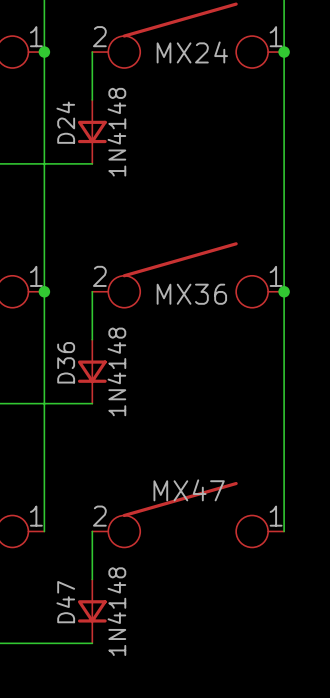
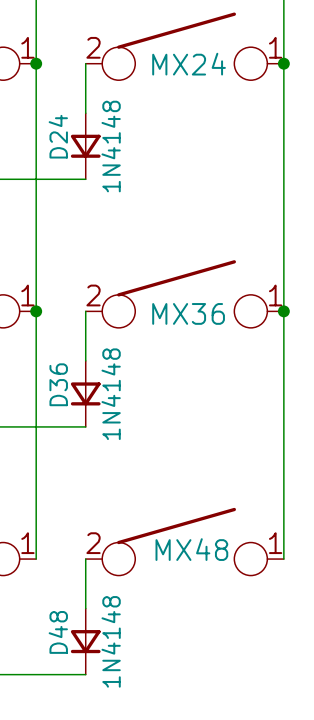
MX47 name: MX47 (189, 490) -> MX48 (191, 549)
D47 name: D47 (65, 602) -> D48 (58, 632)

